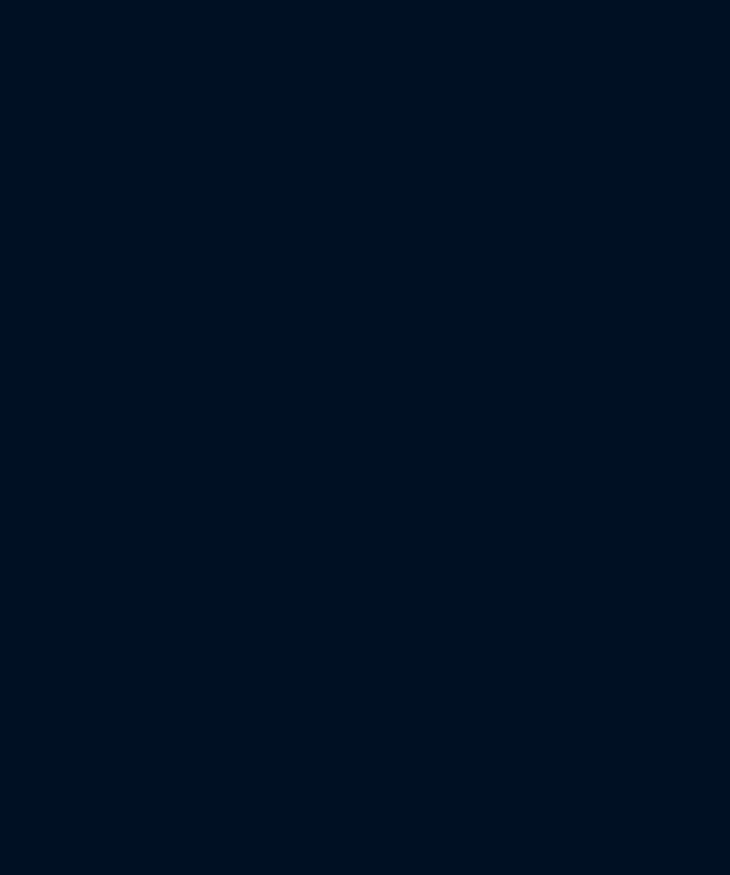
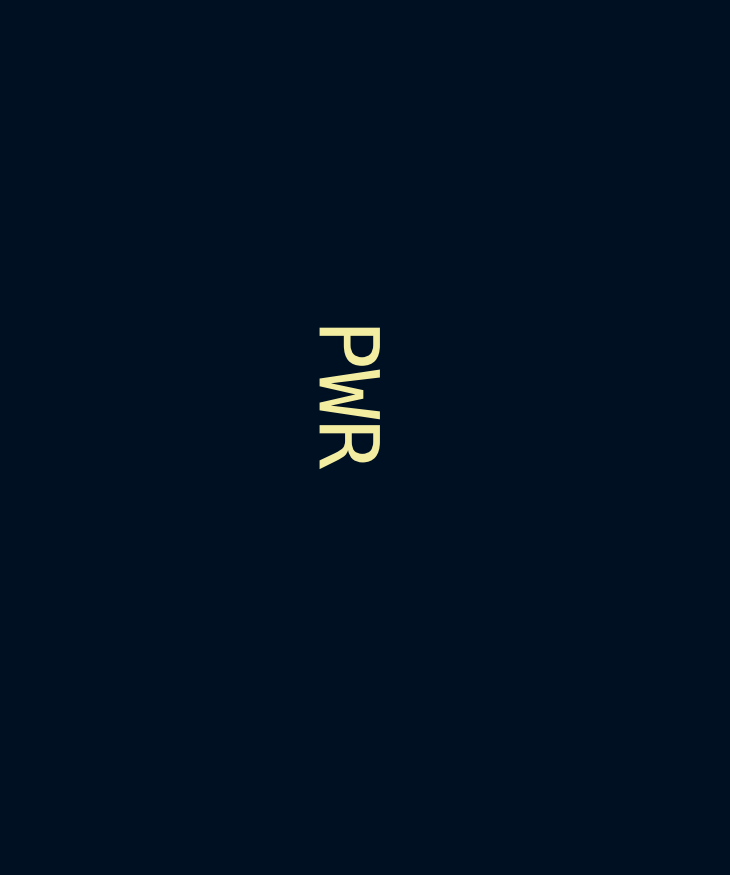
text: none -> PWR (349, 398)

